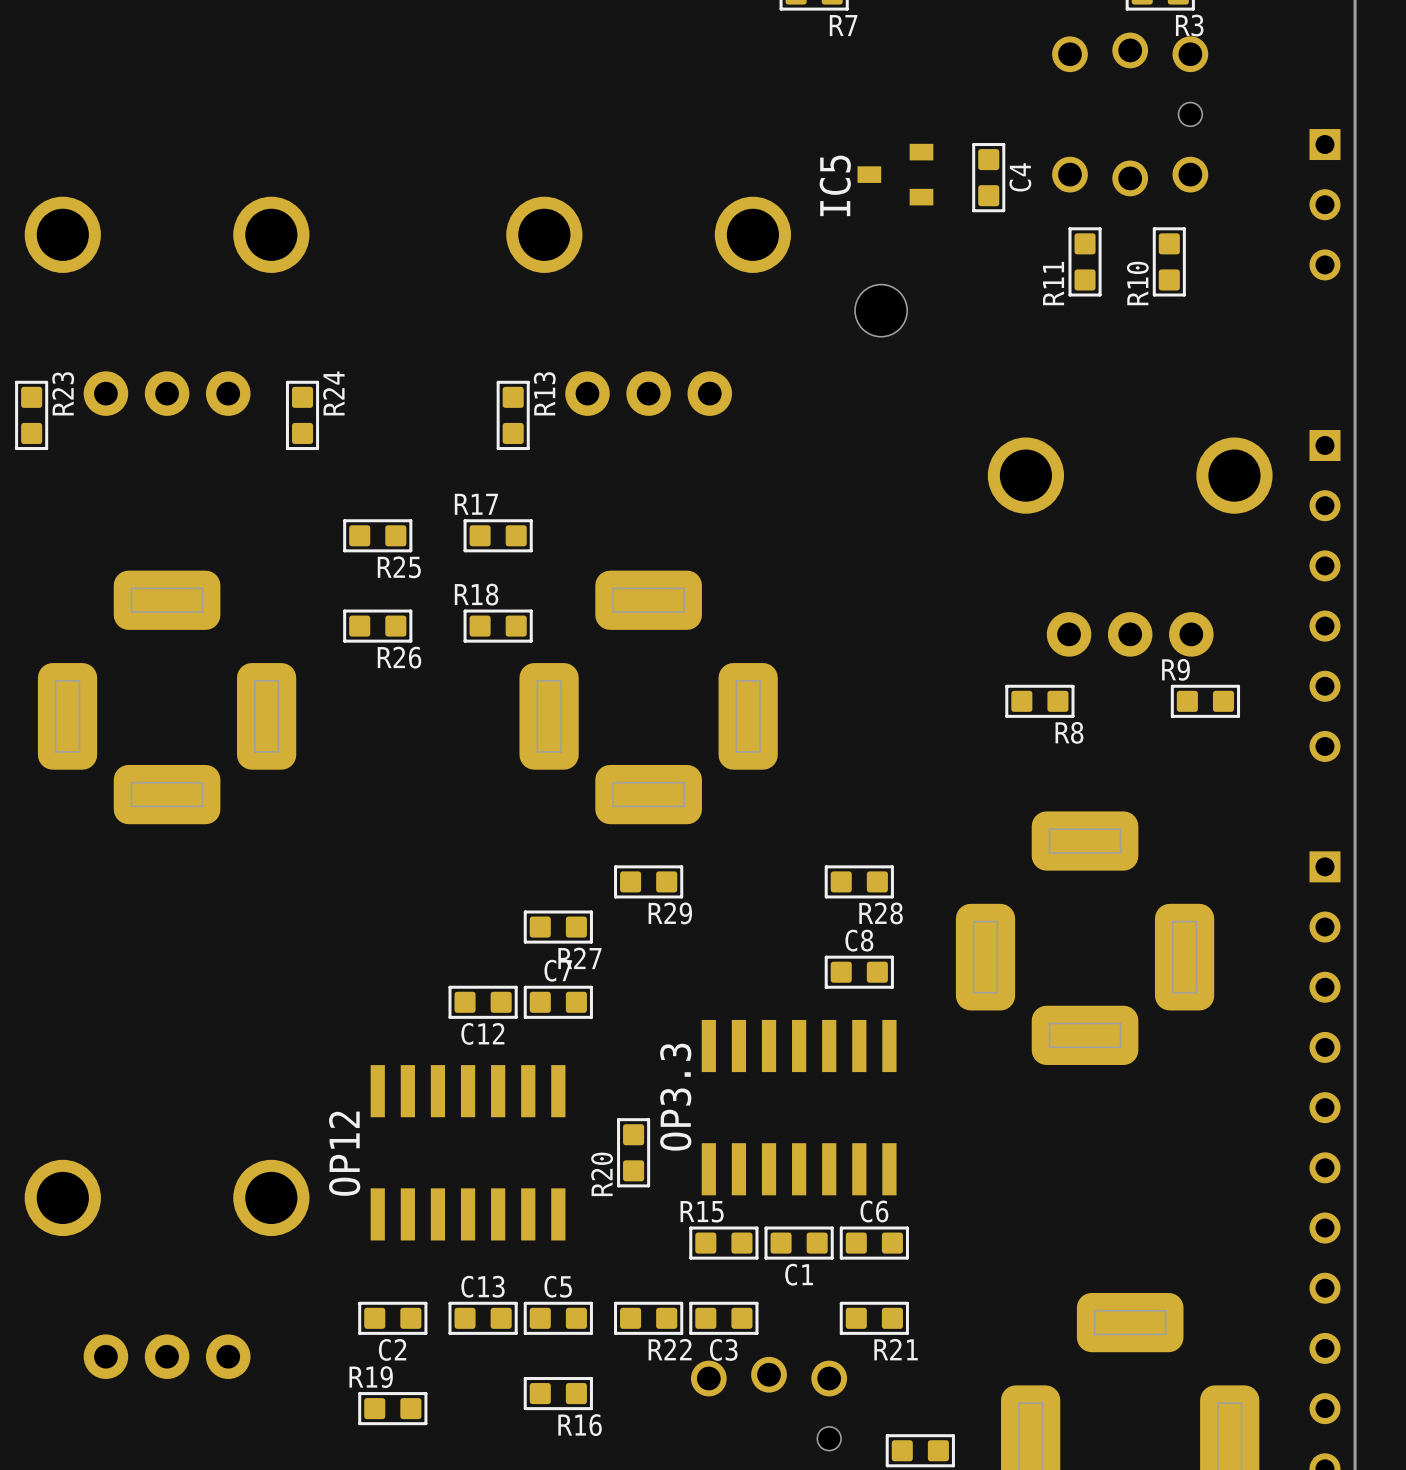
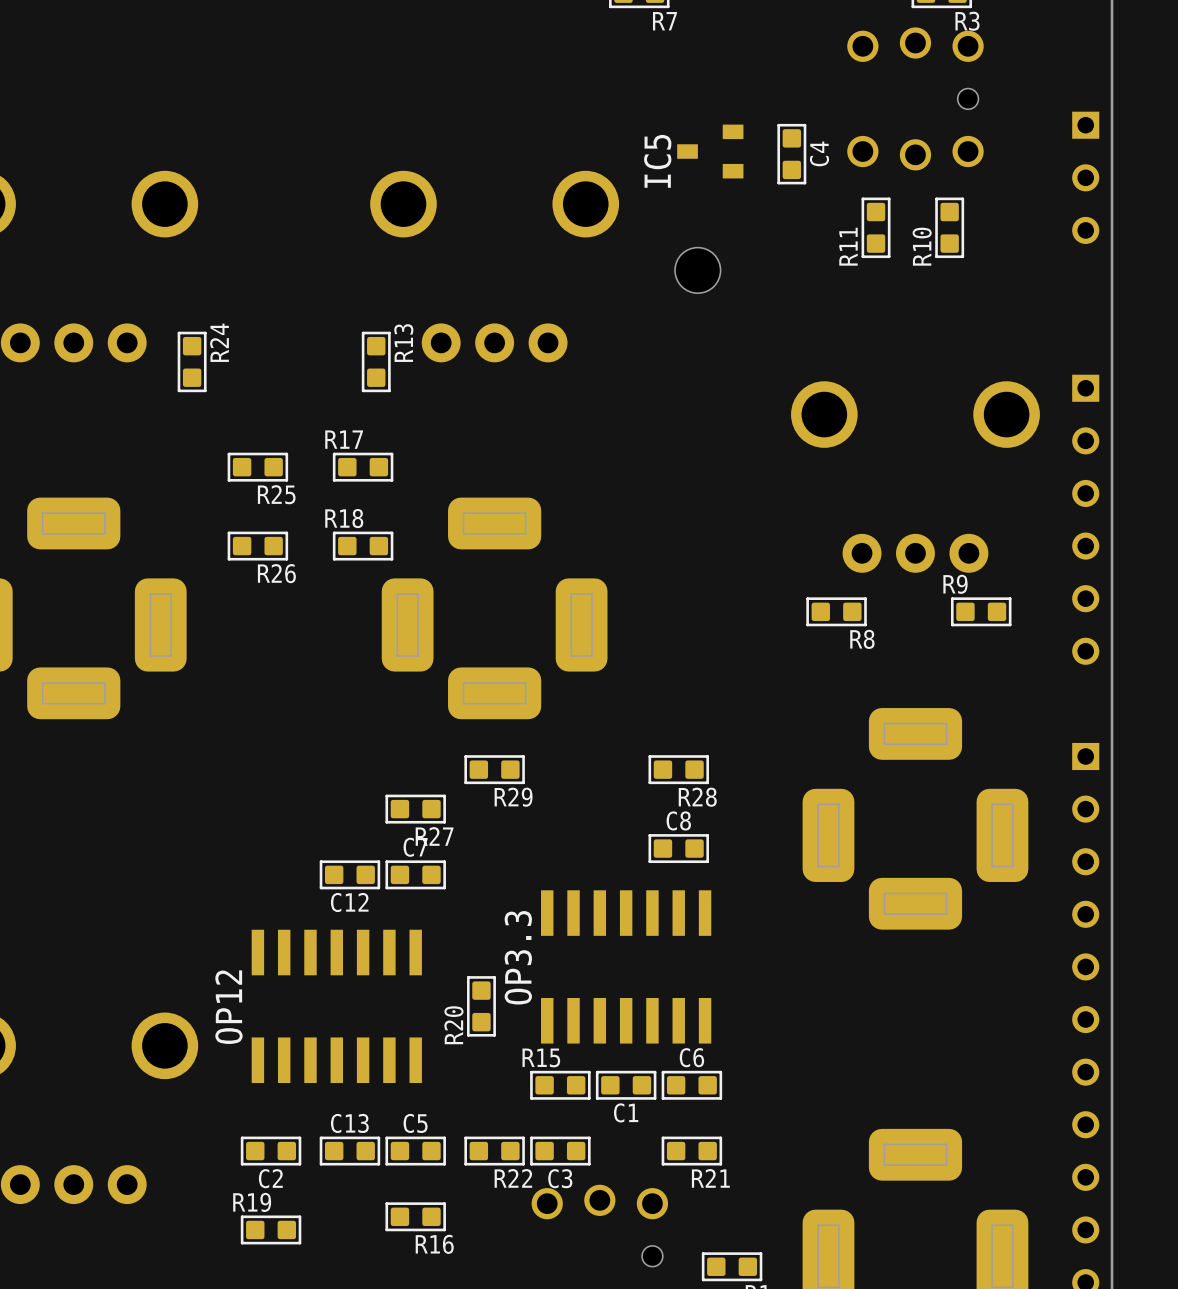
part position: (1085, 938) -> (915, 818)

